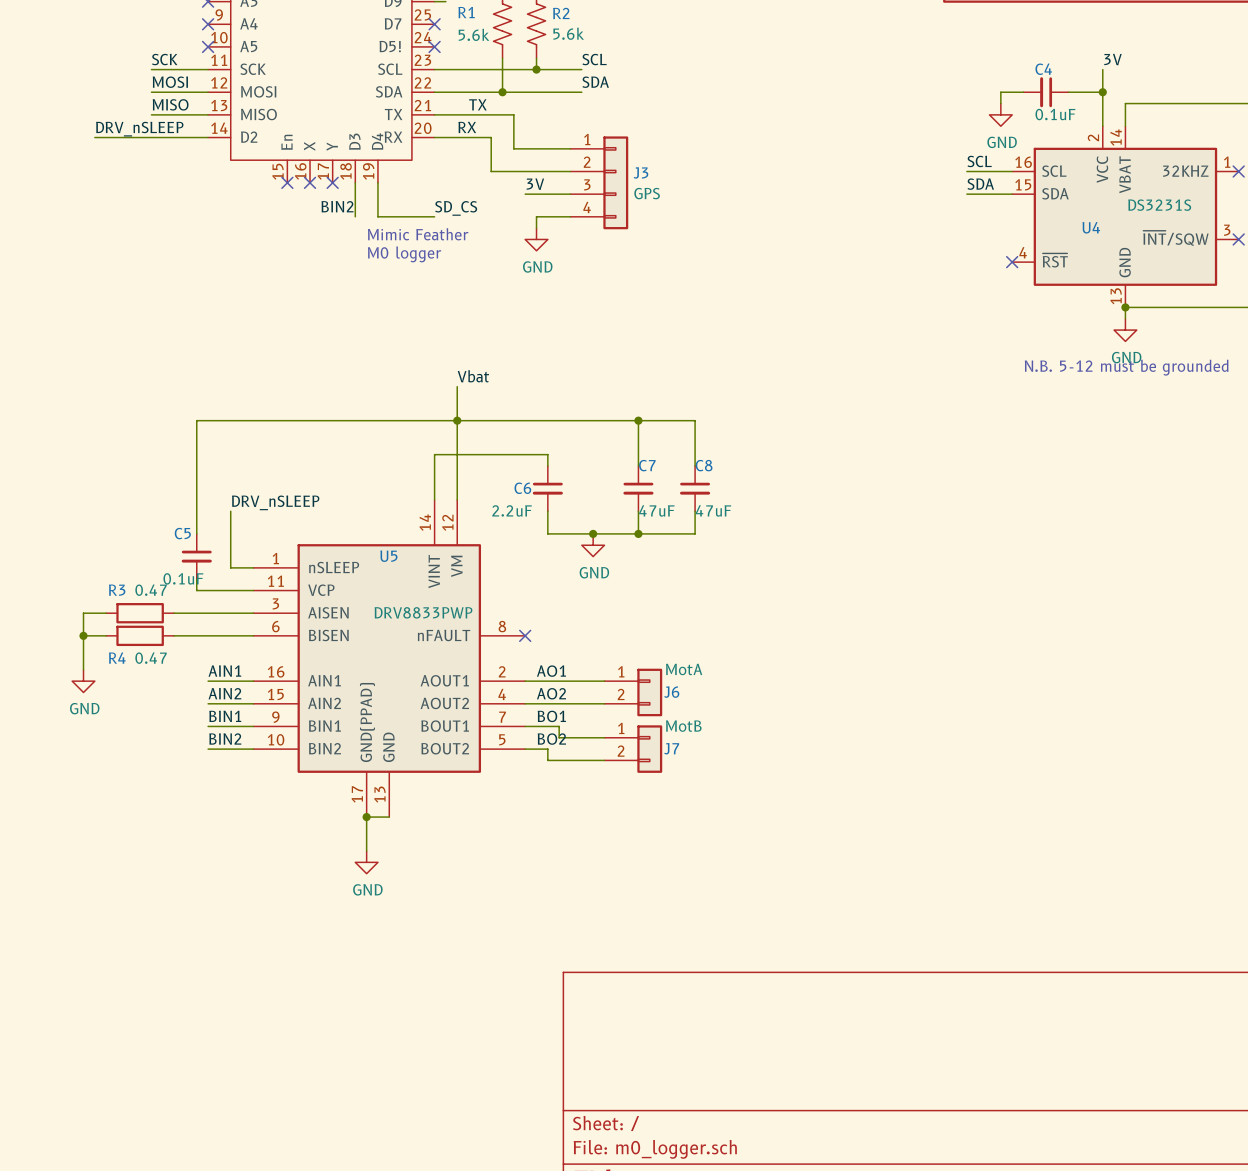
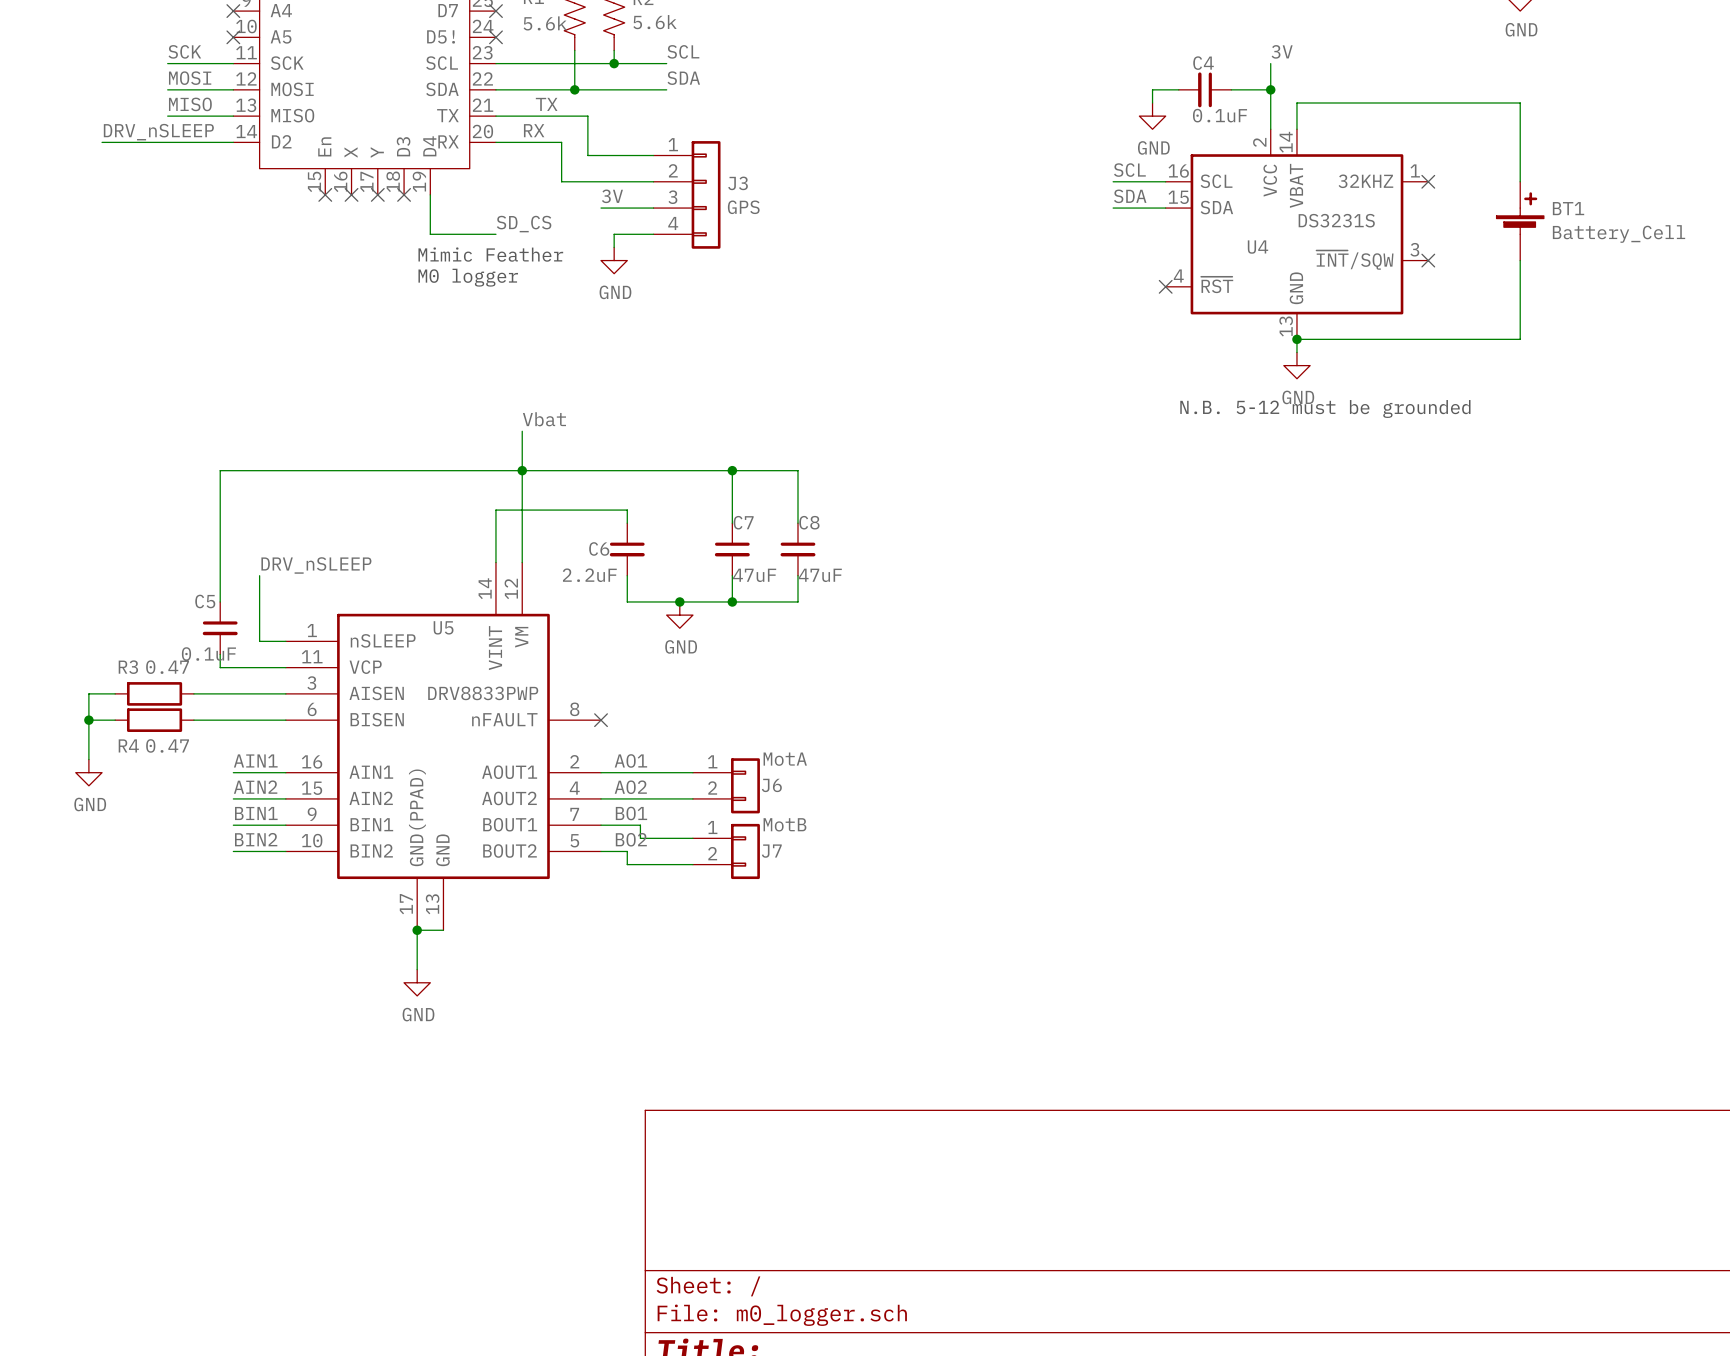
wire: (355, 182) (355, 216) -> none
no-connect mark: none -> (404, 194)
label: BIN2 (337, 206) -> none

